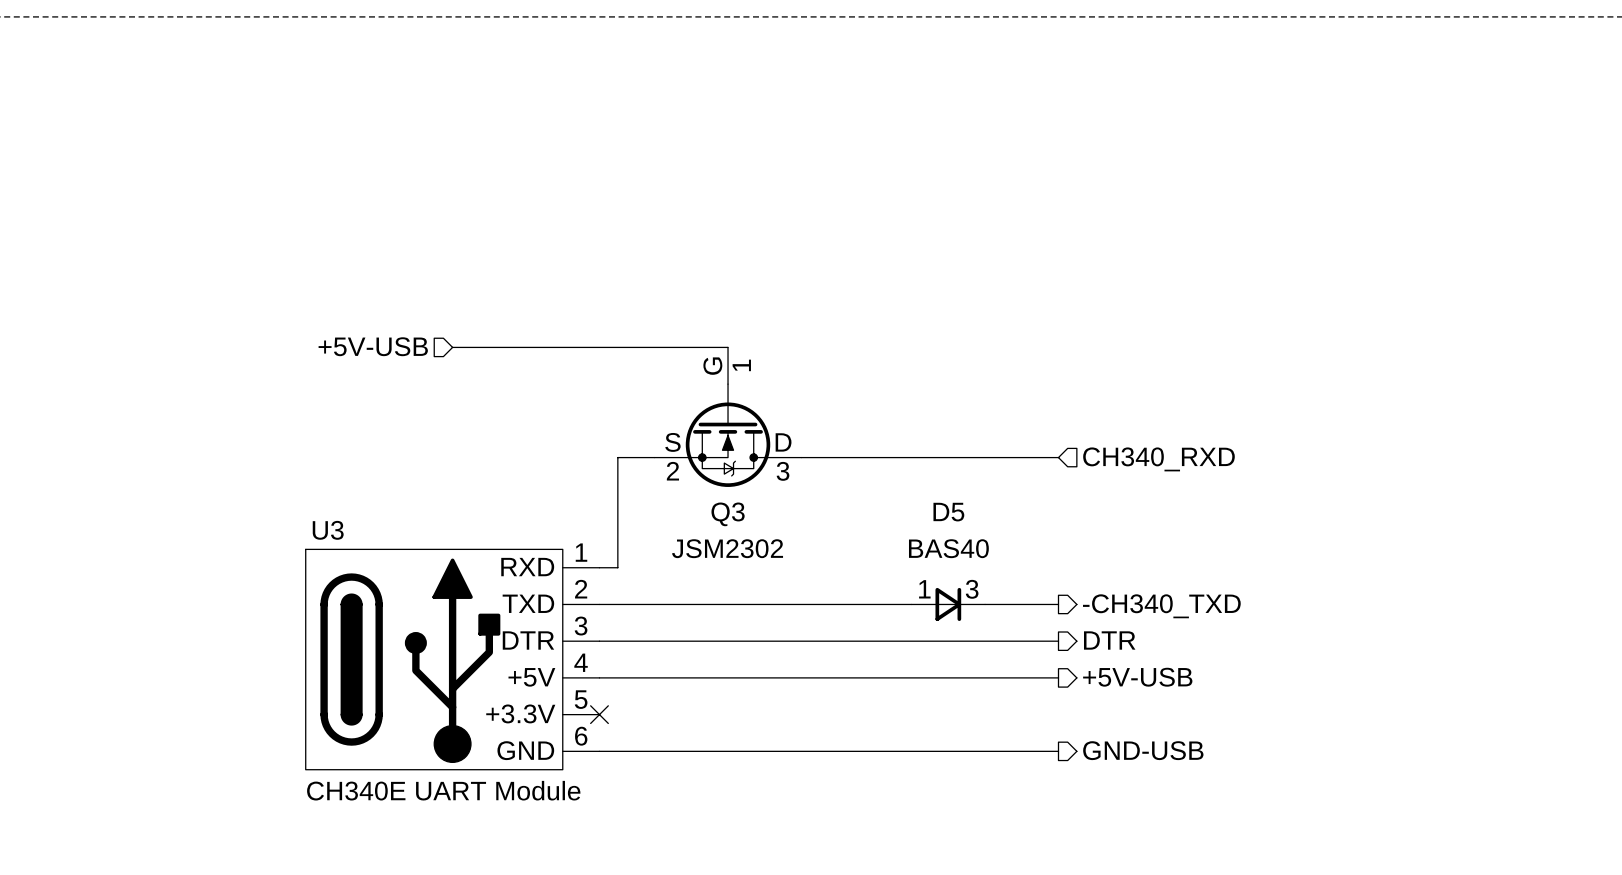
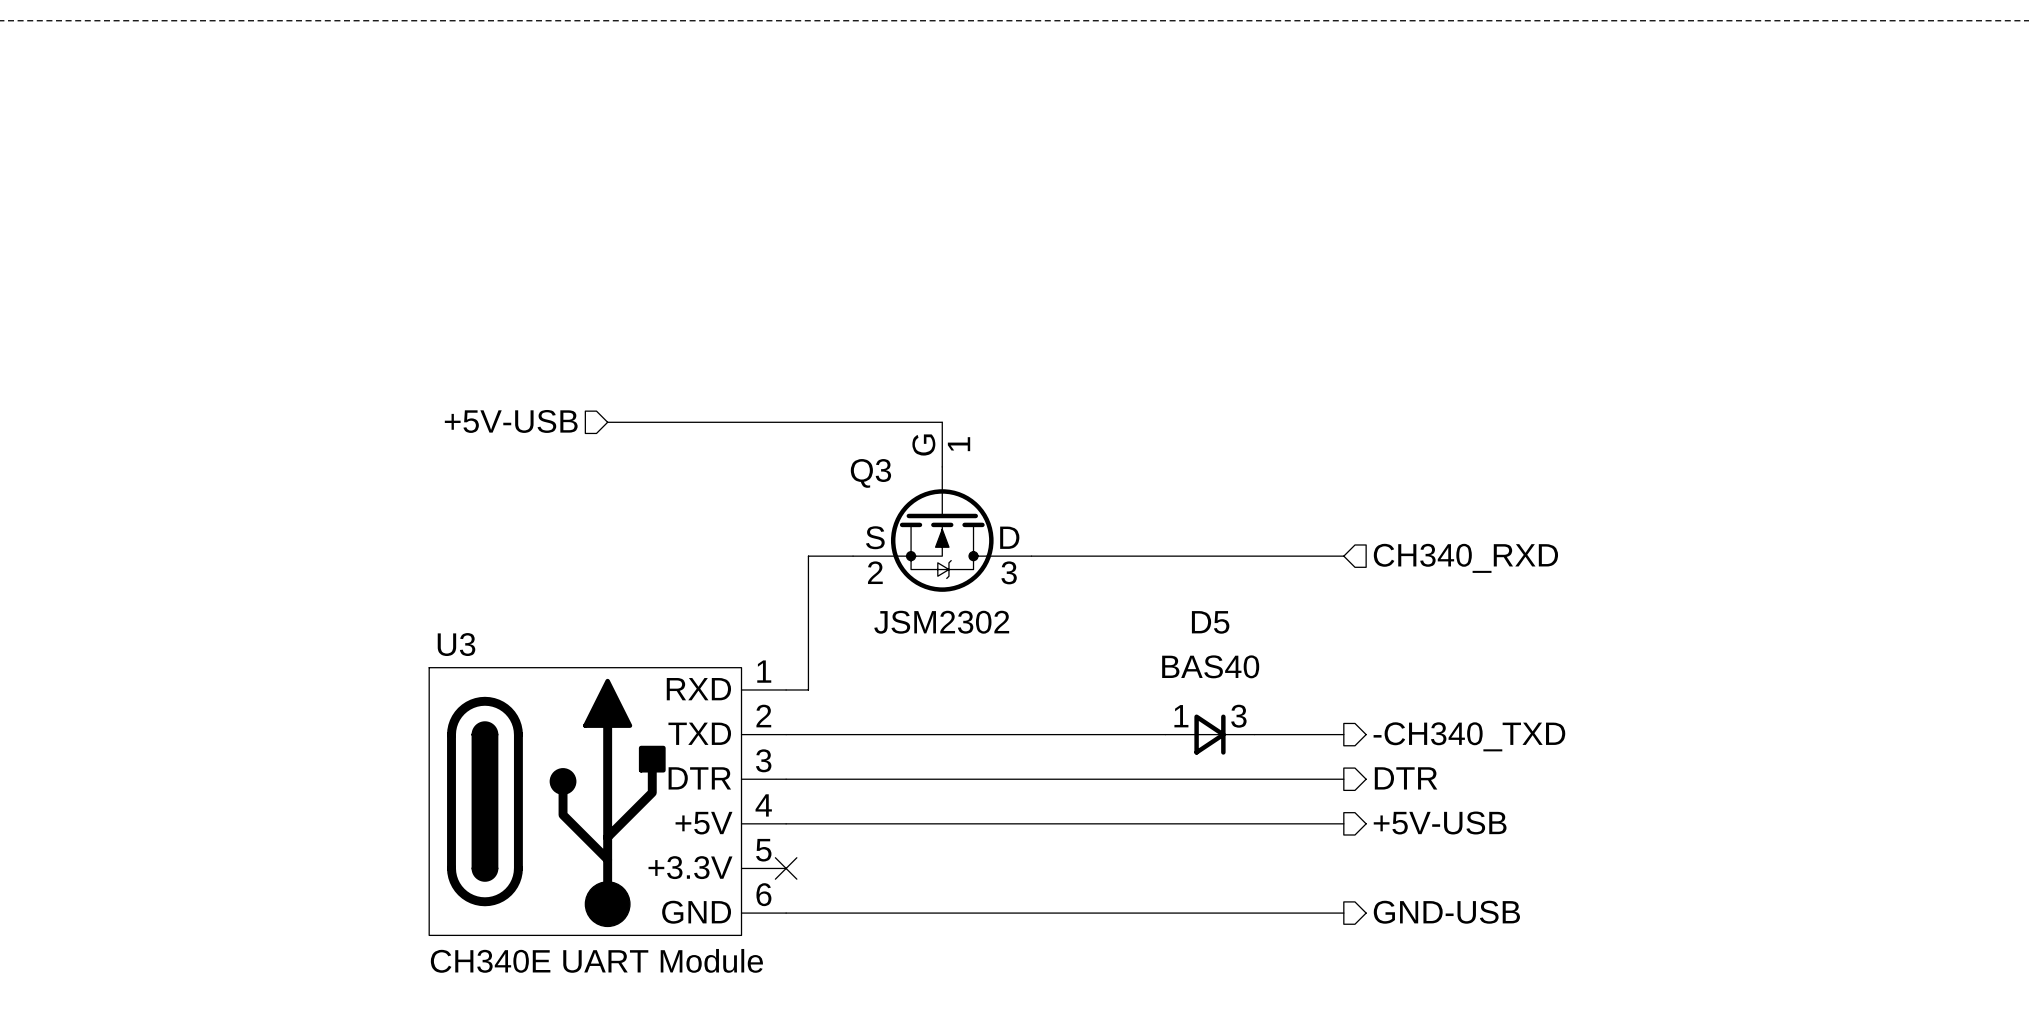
Q3 name position: Q3 (728, 514) -> Q3 (870, 473)
Q3 value position: JSM2302 (727, 548) -> JSM2302 (941, 622)

